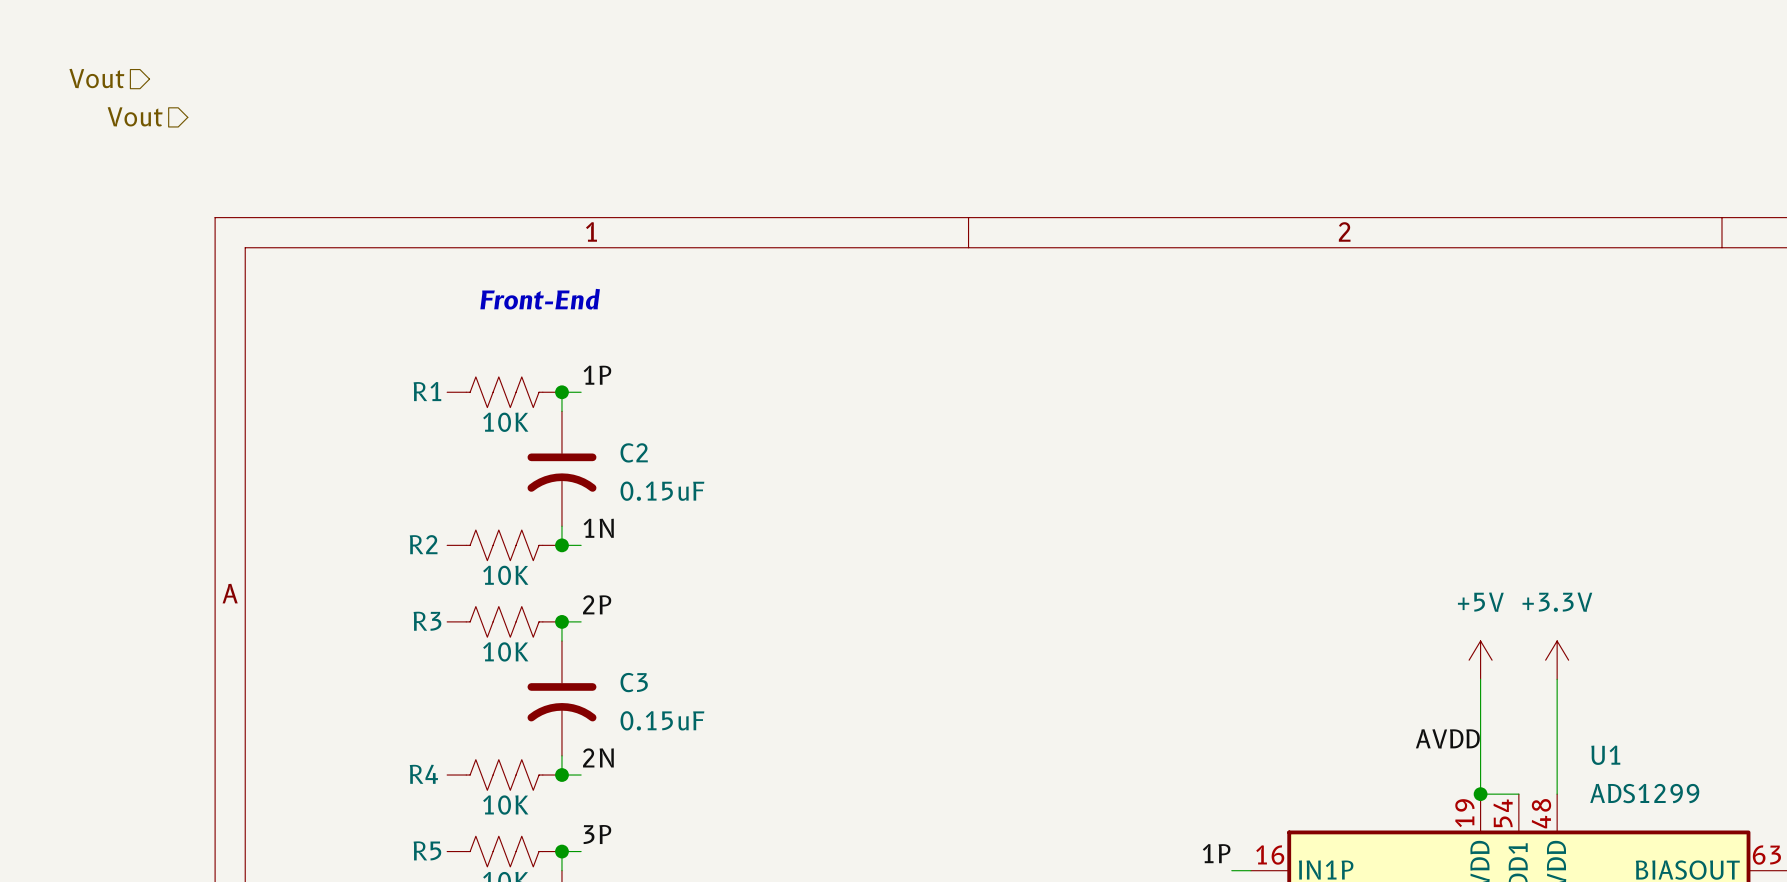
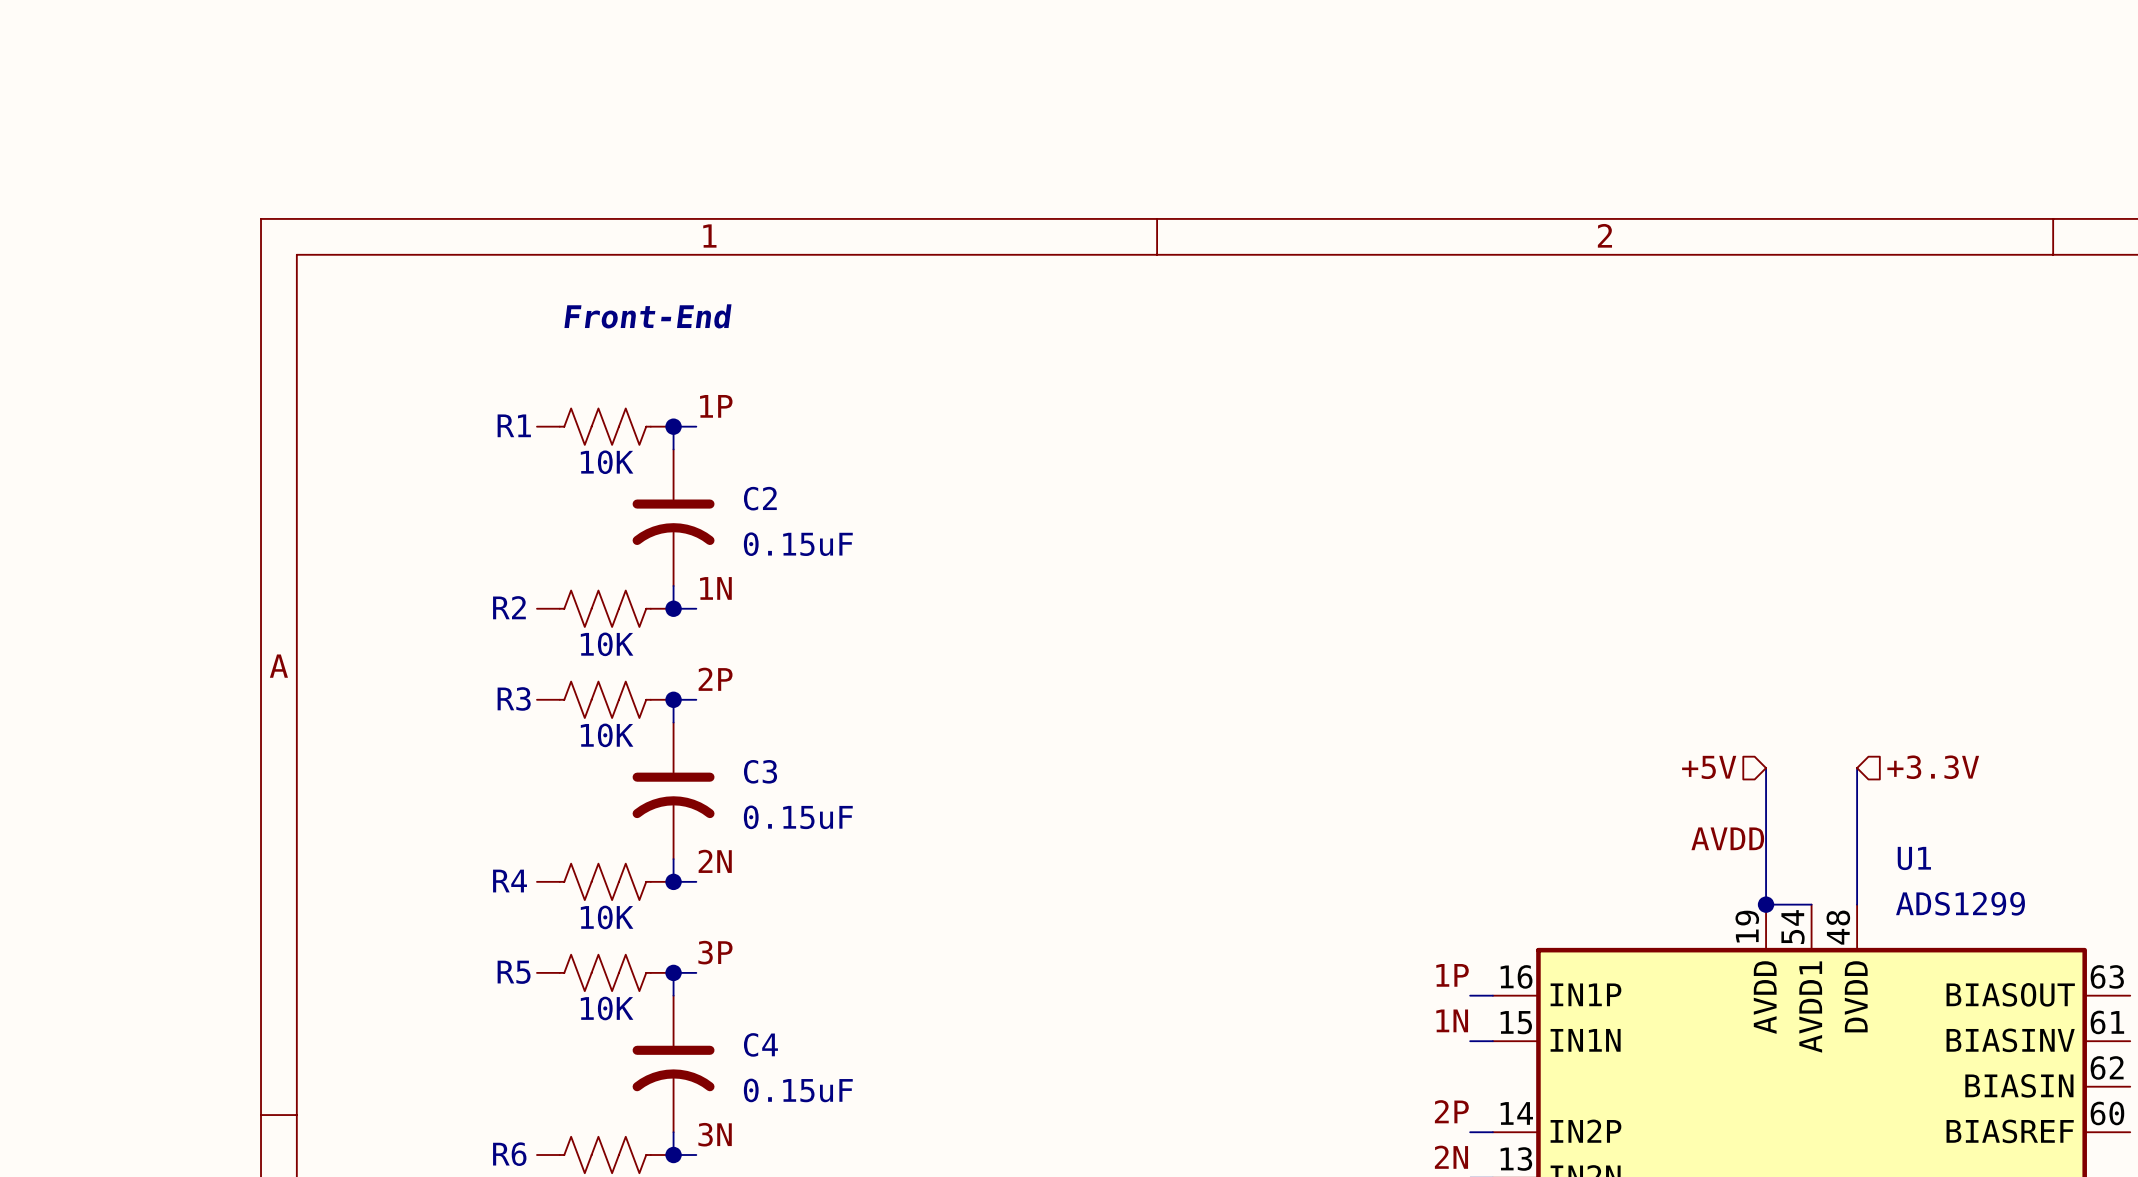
hierarchical label: Vout (96, 78) -> none
hierarchical label: Vout (135, 116) -> none
power symbol: +5V (1480, 660) -> none
power symbol: +3.3V (1557, 660) -> none
hierarchical label: none -> +5V (1709, 767)
hierarchical label: none -> +3.3V (1933, 767)

